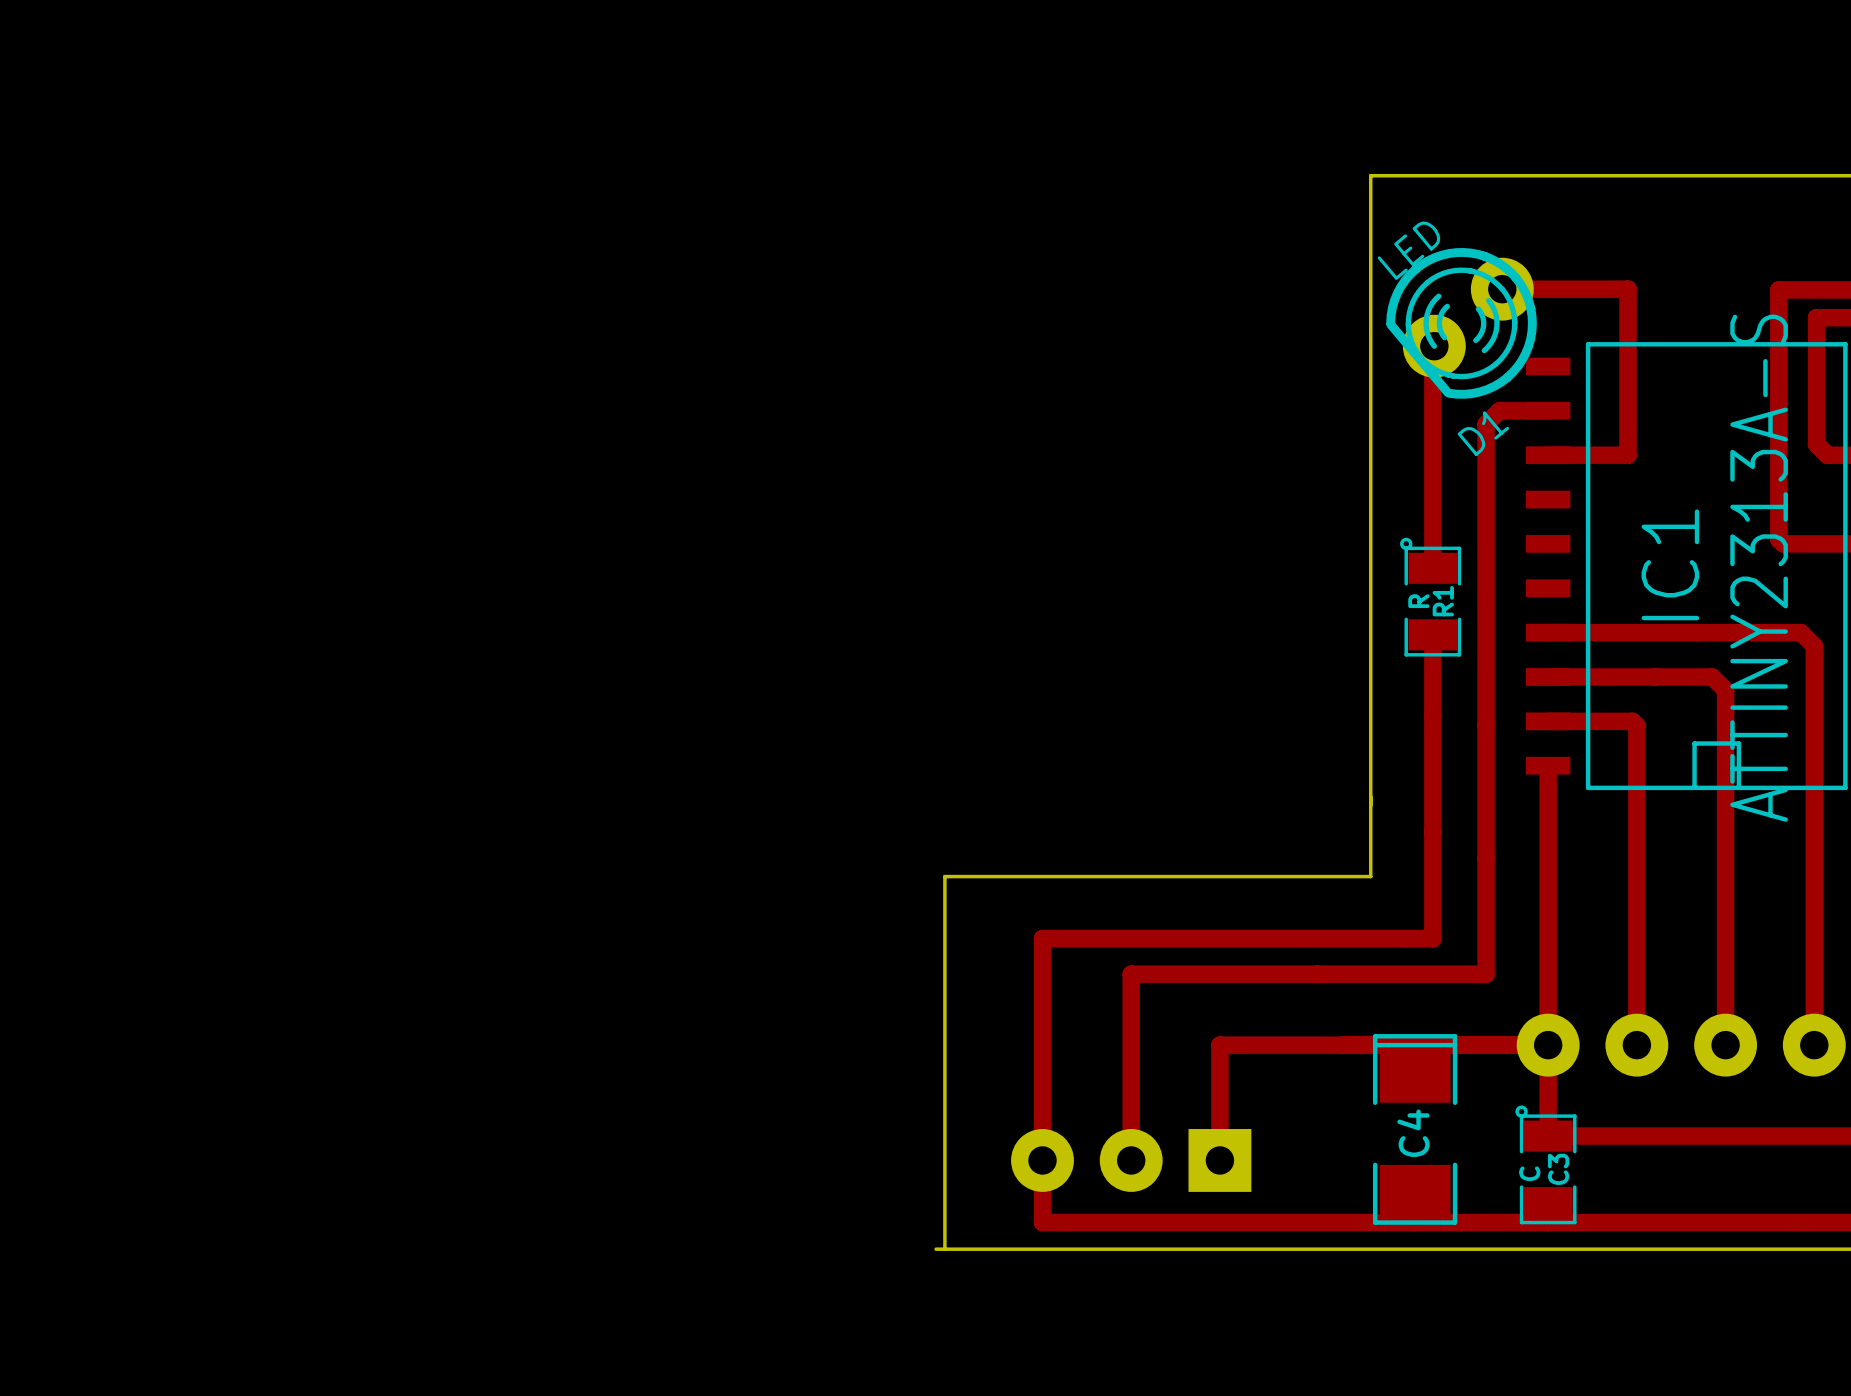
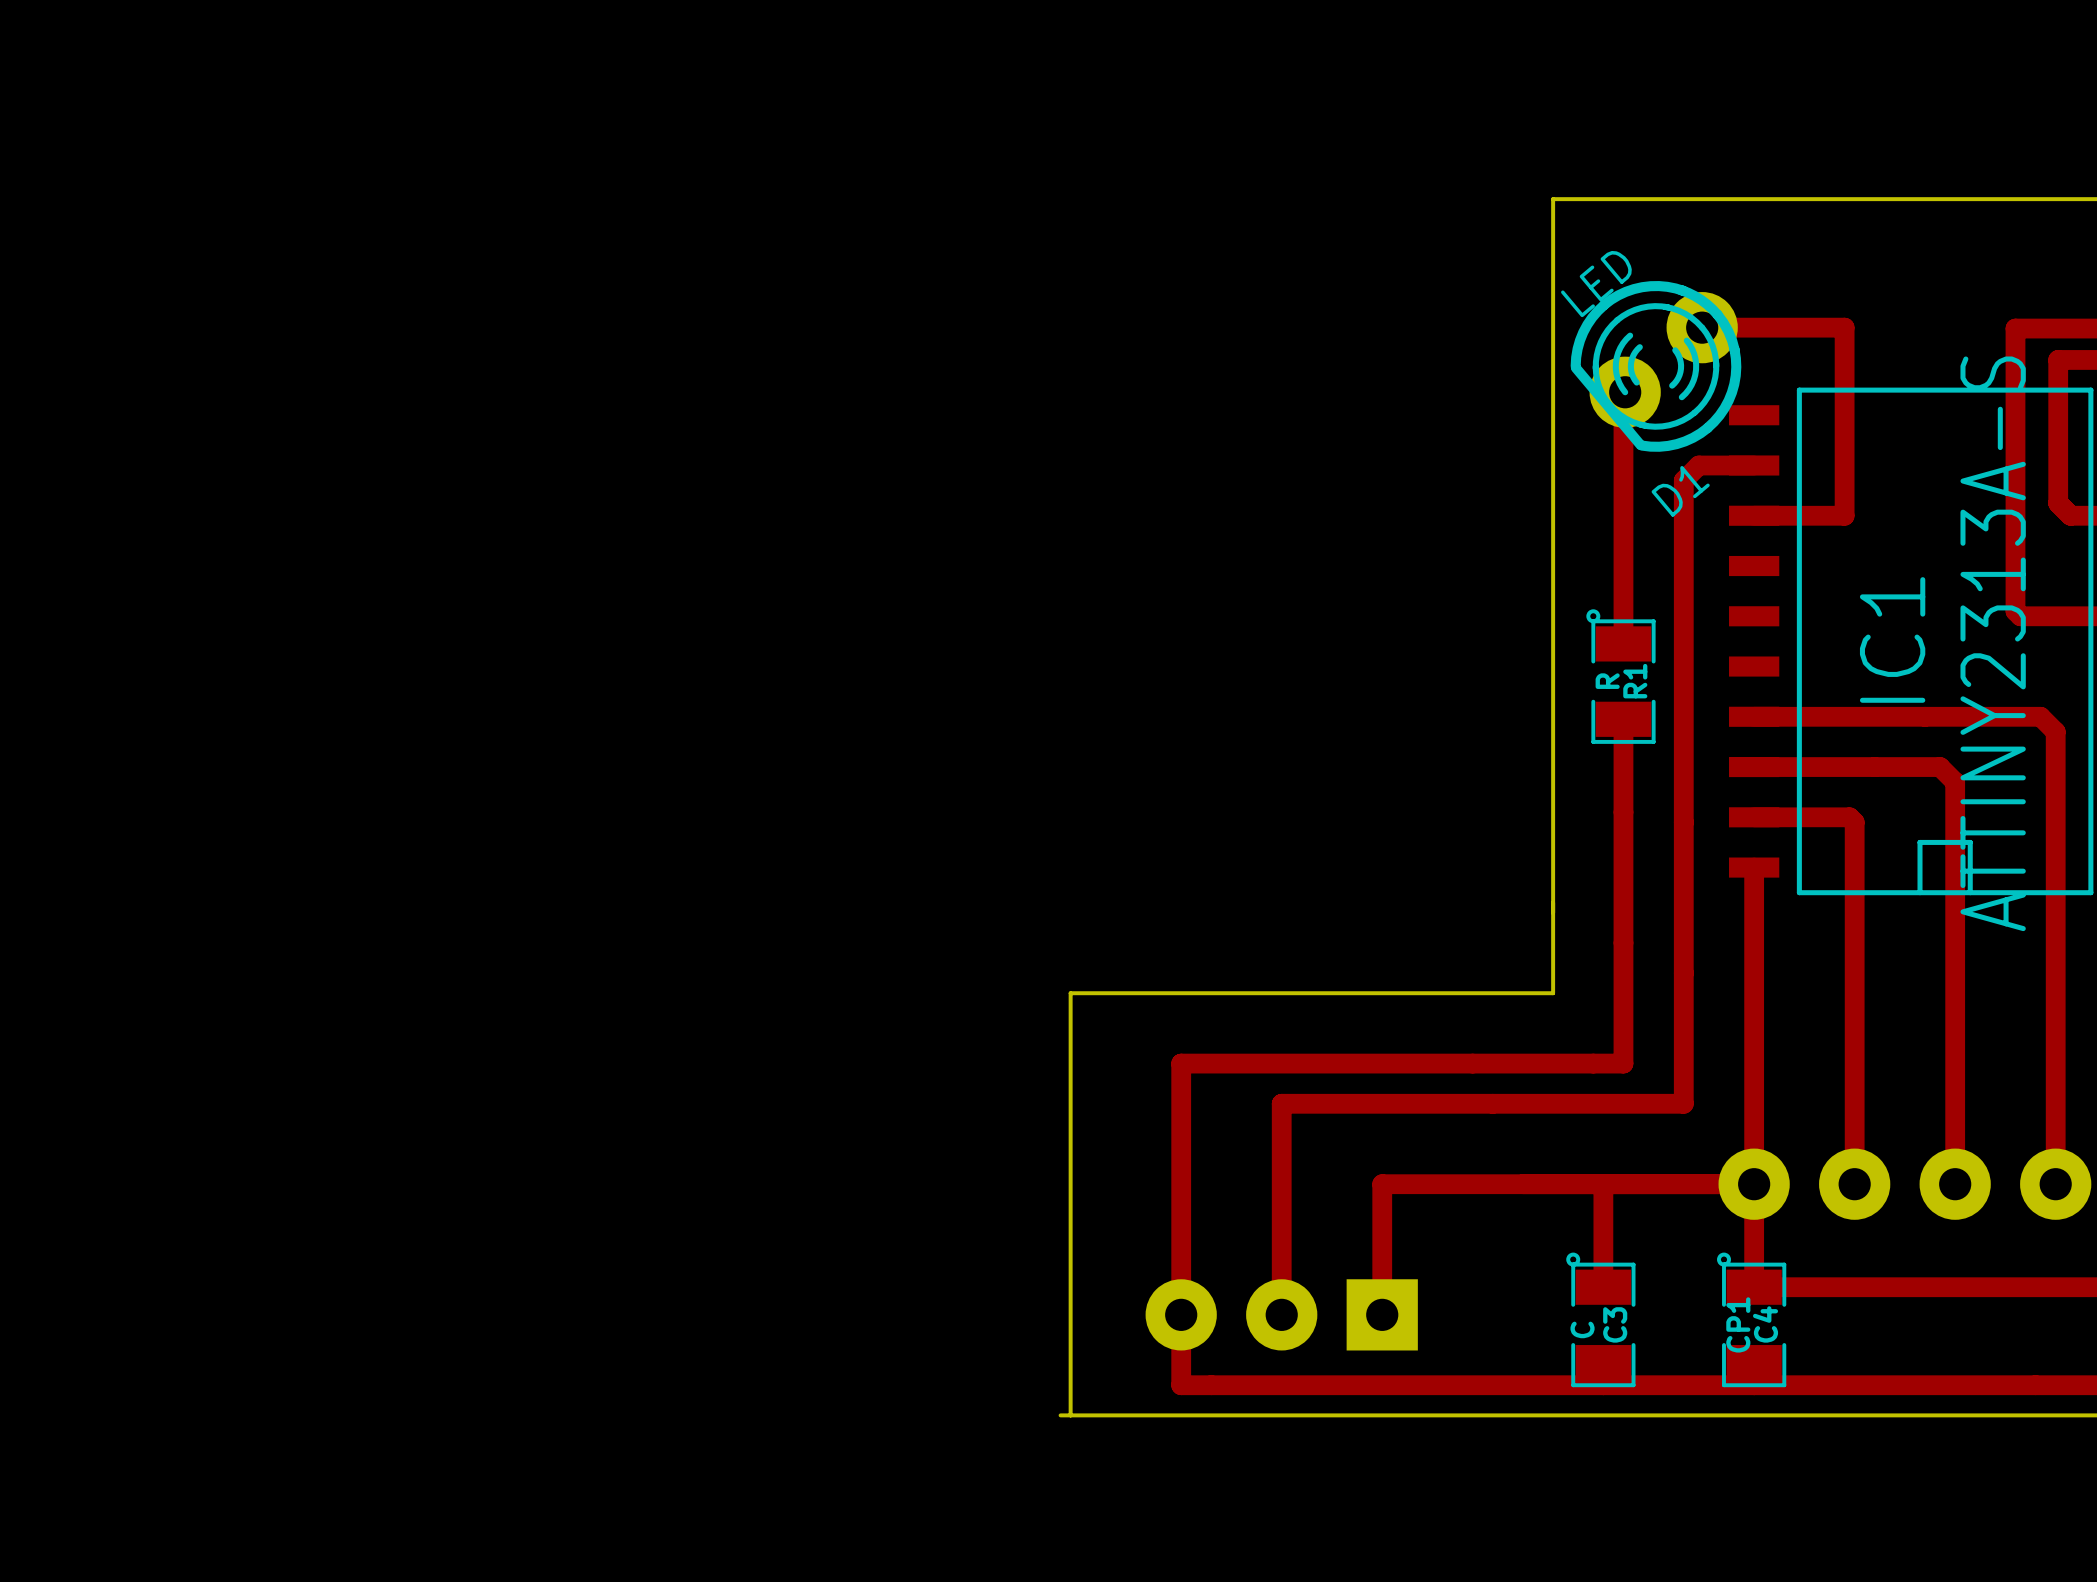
track: none -> (1603, 1229) (1603, 1287)
C4: (1415, 1129) -> none
C3: none -> C (1600, 1319)
C3 name: C3 (1558, 1169) -> C4 (1765, 1324)
C3 value: C (1529, 1173) -> CP1 (1738, 1324)

